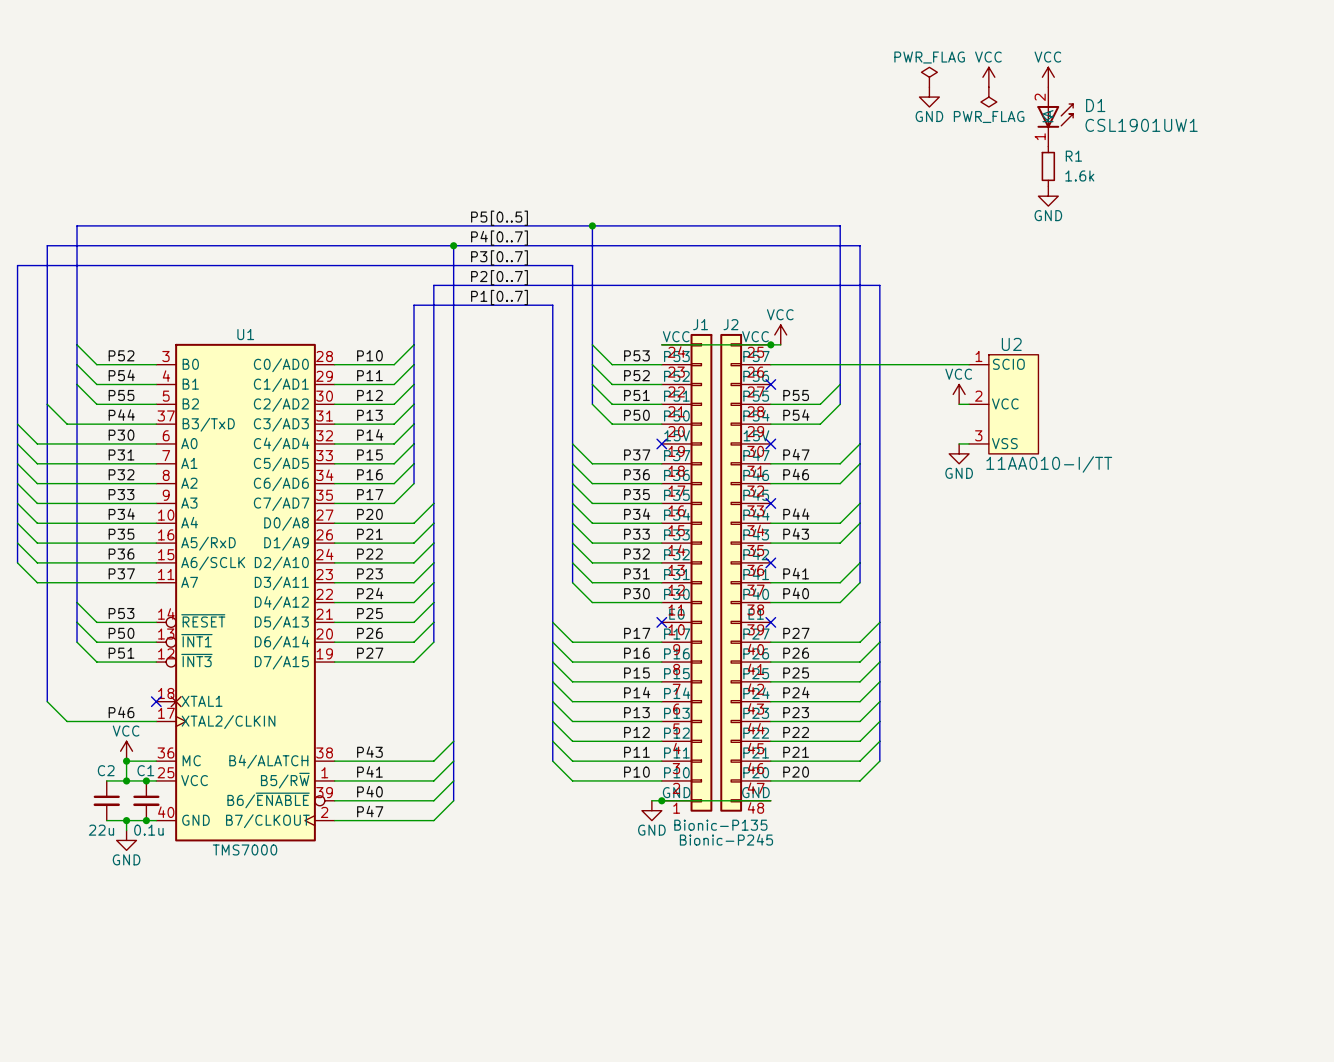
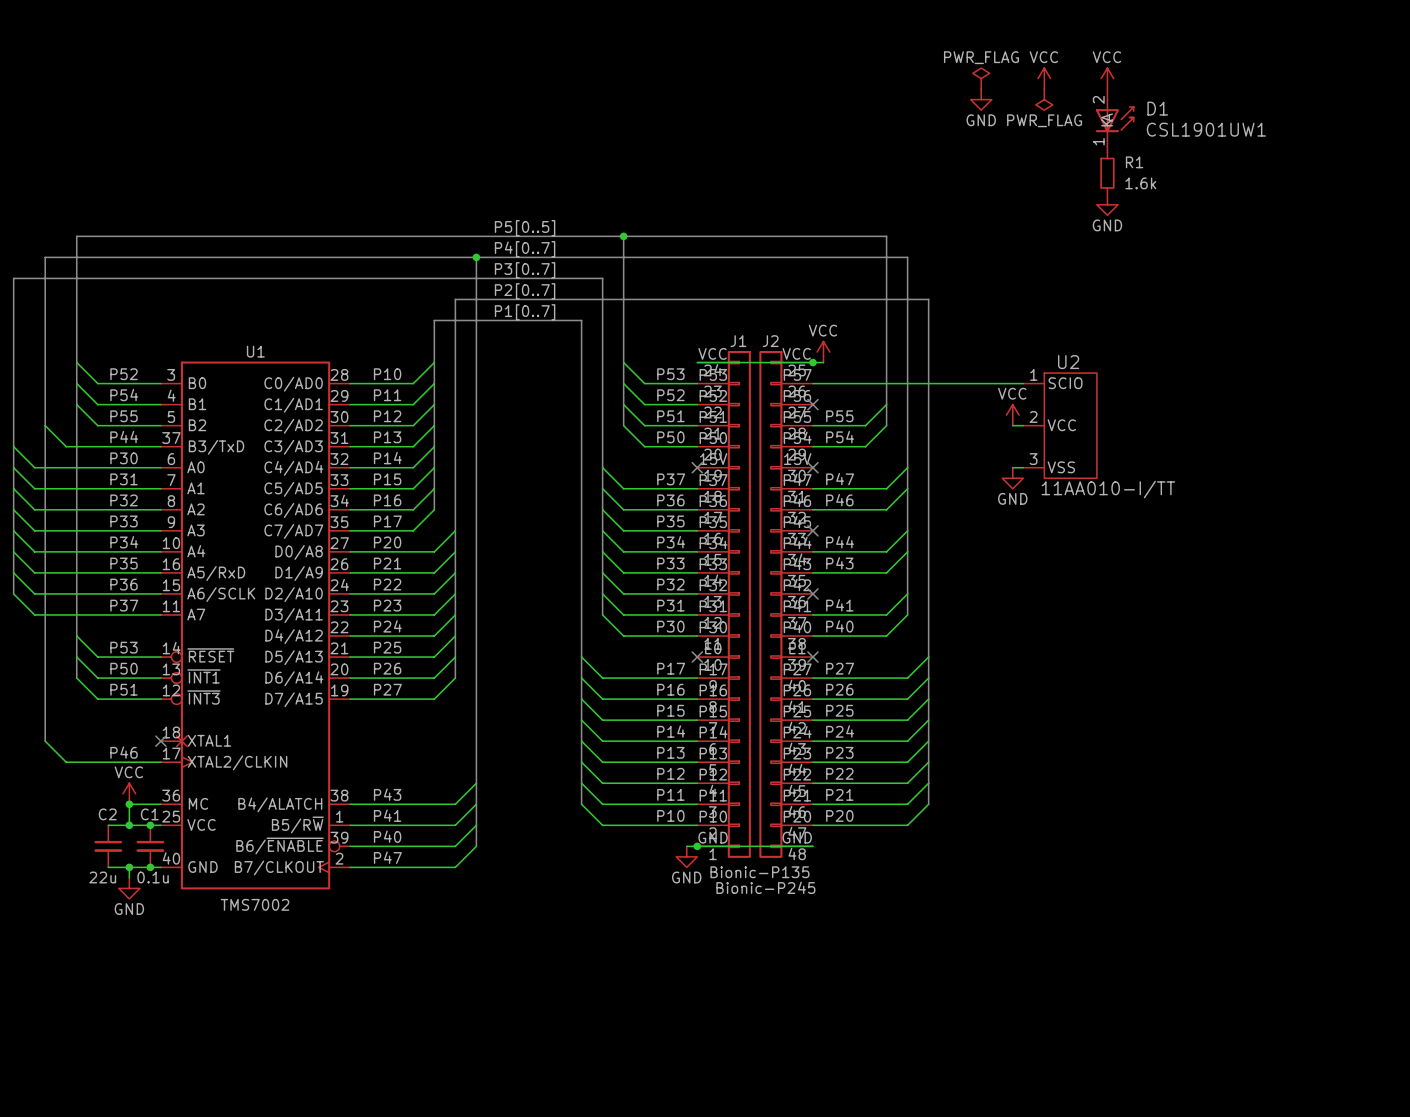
U1 value: TMS7000 (245, 849) -> TMS7002 (255, 904)

